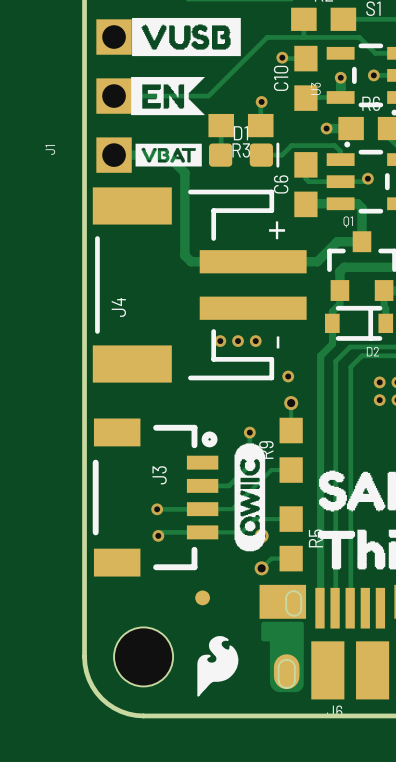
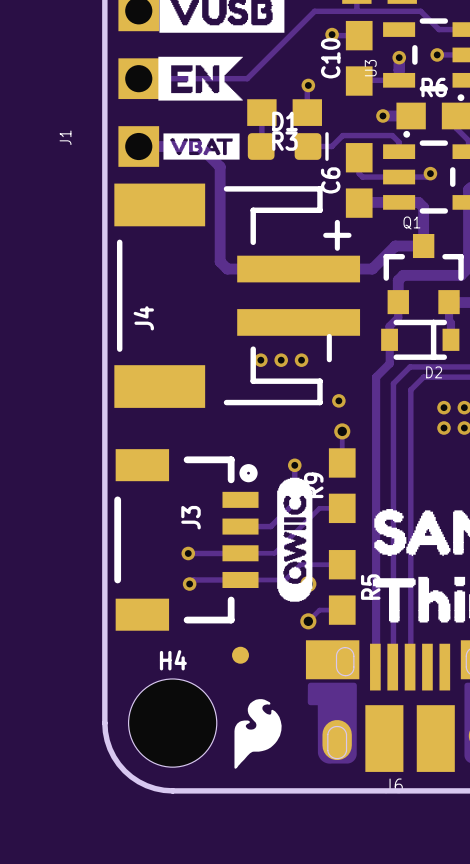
hole: (143, 656) -> none
H4: none -> (172, 723)

